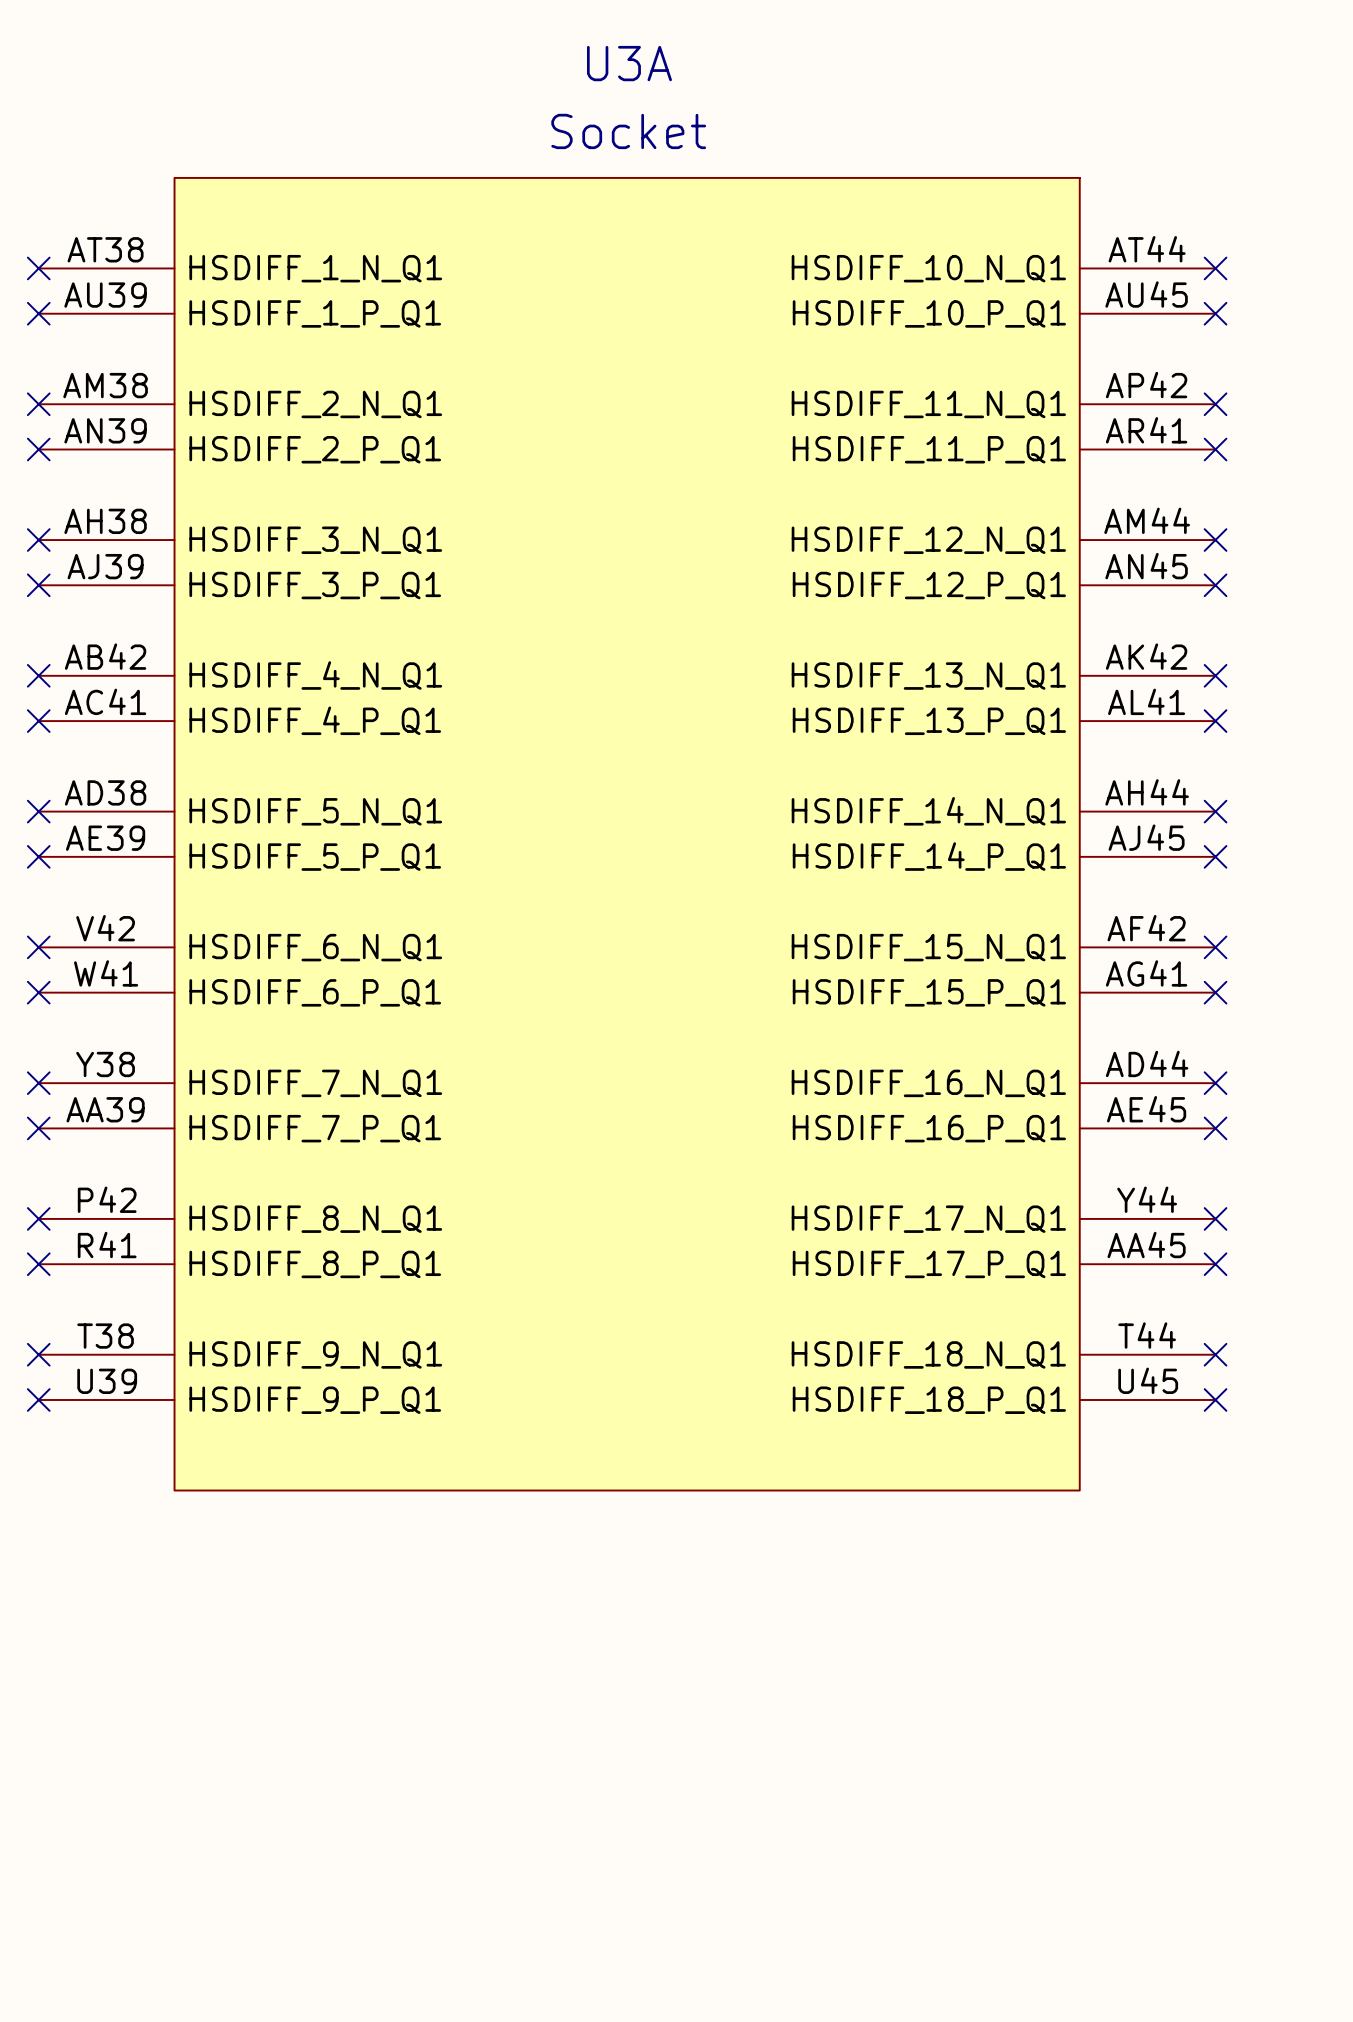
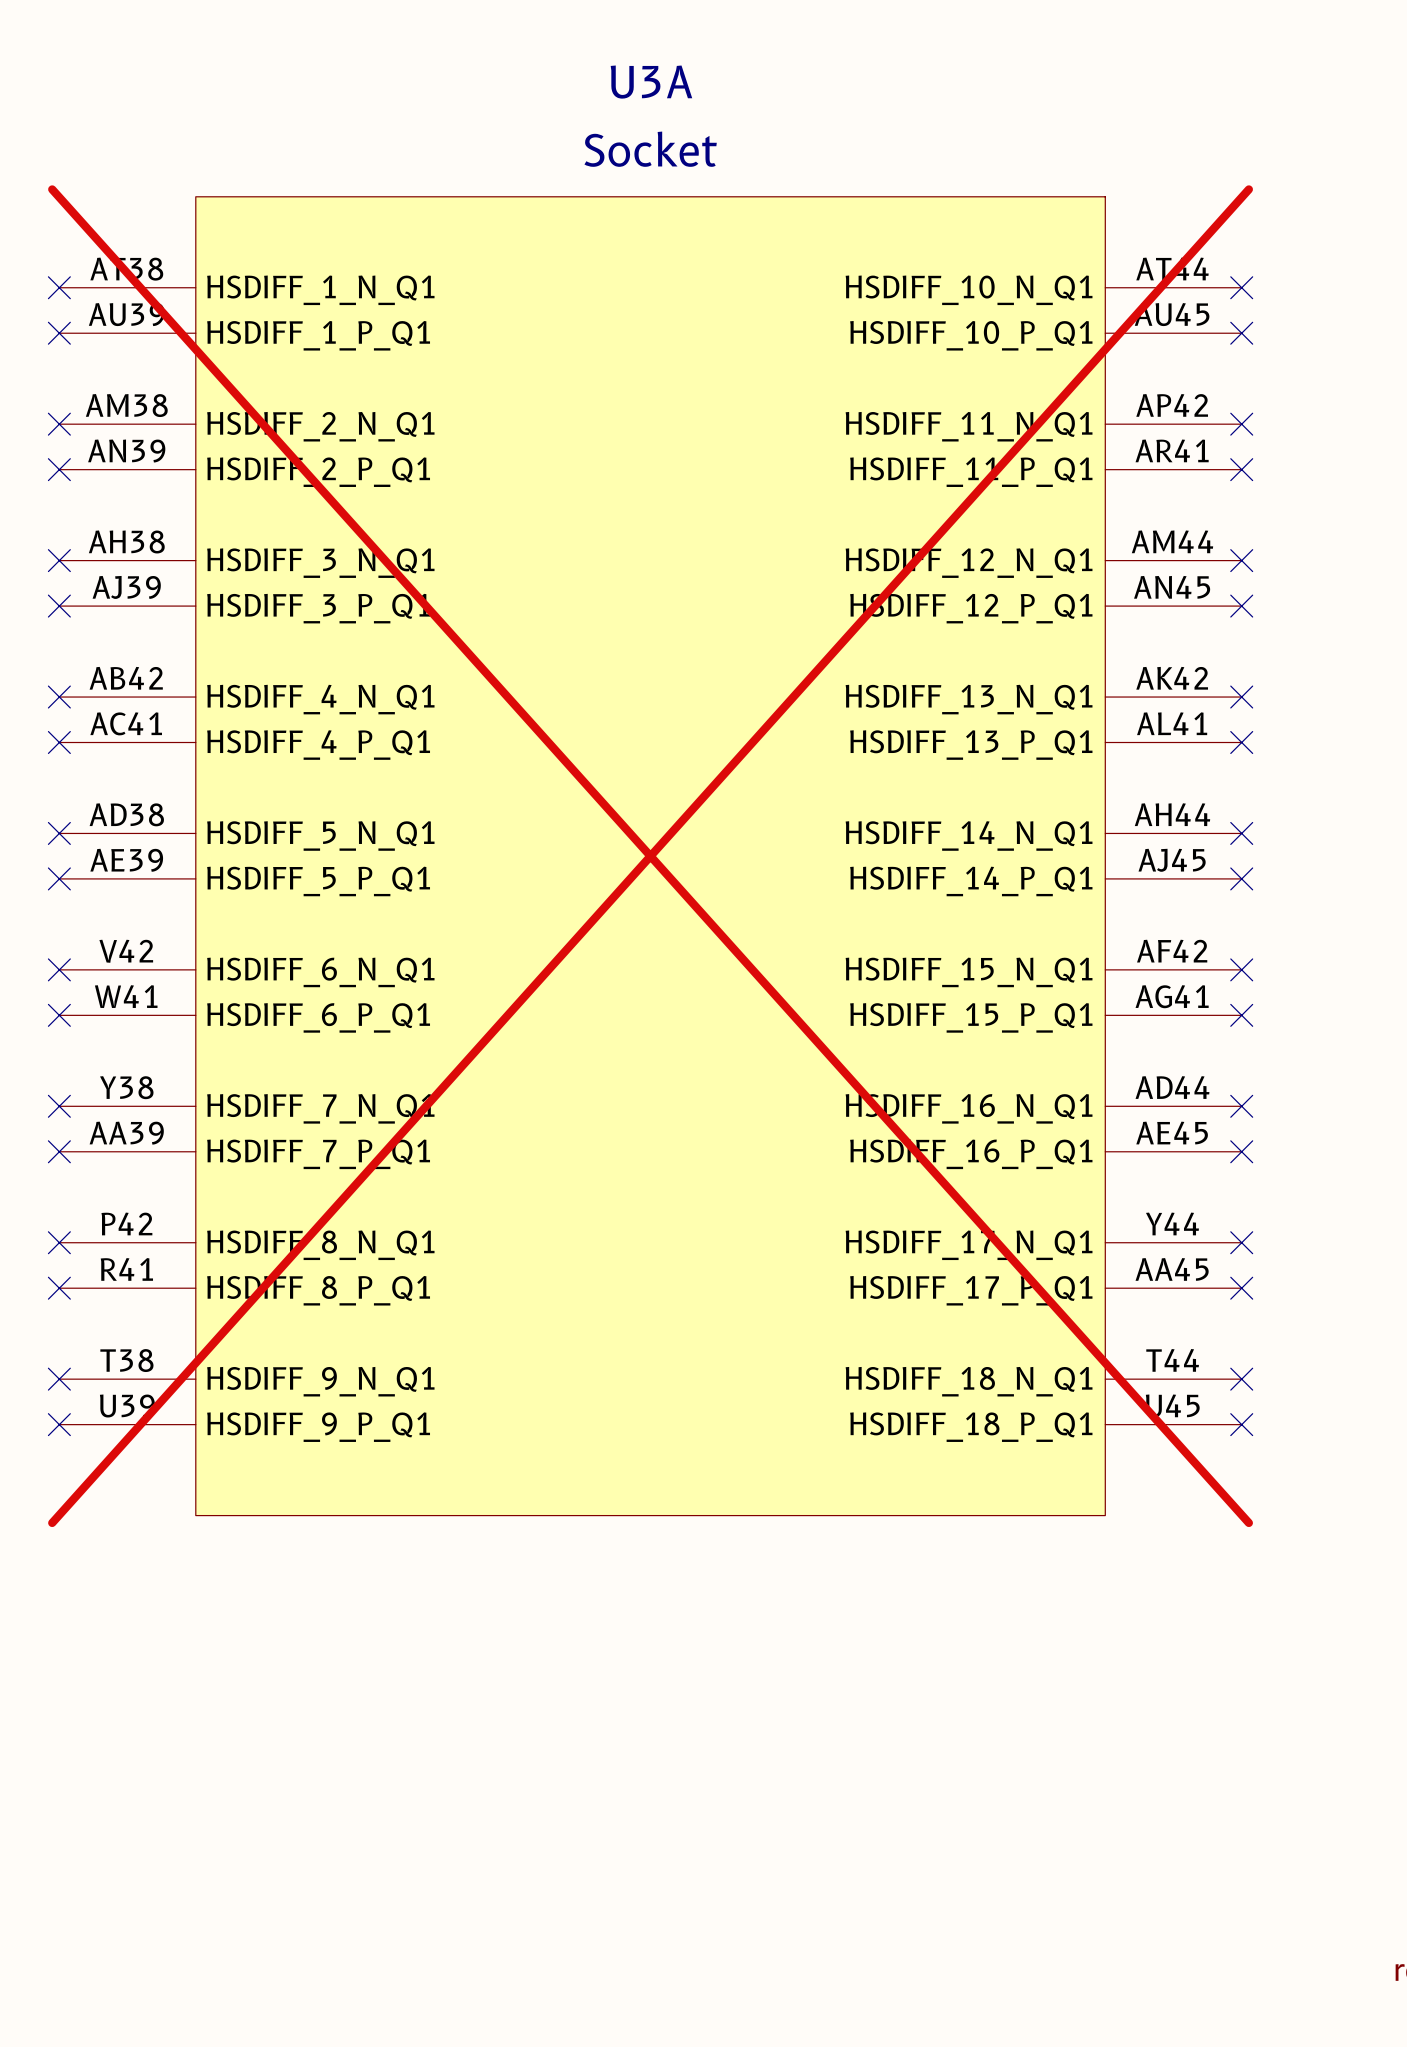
U3A do-not-place cross: none -> (650, 856)

